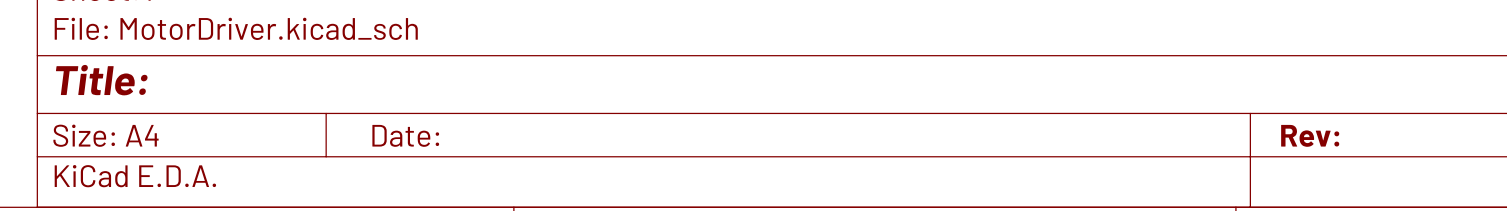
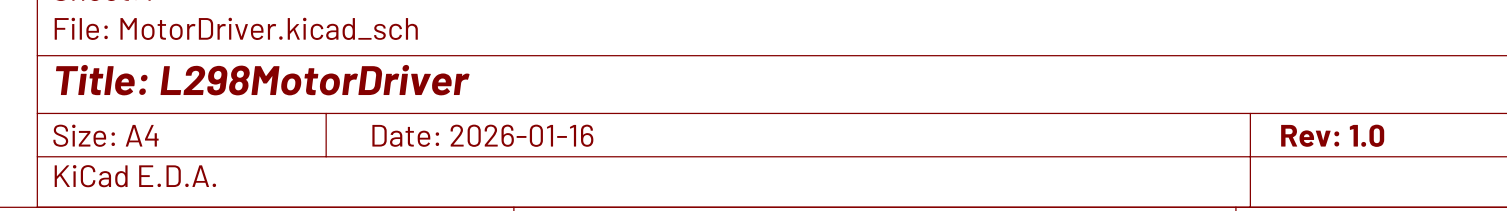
title block: Title: (101, 80) -> Title: L298MotorDriver (262, 80)
title block: Date: (405, 135) -> Date: 2026-01-16 (482, 135)
title block: Rev: (1310, 135) -> Rev: 1.0 (1332, 135)

